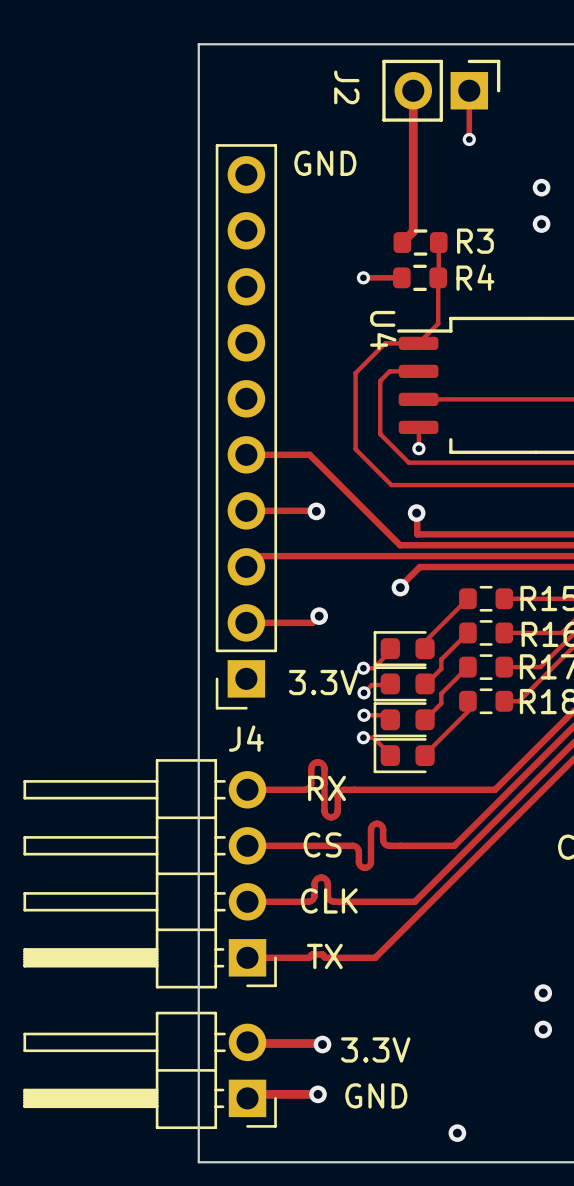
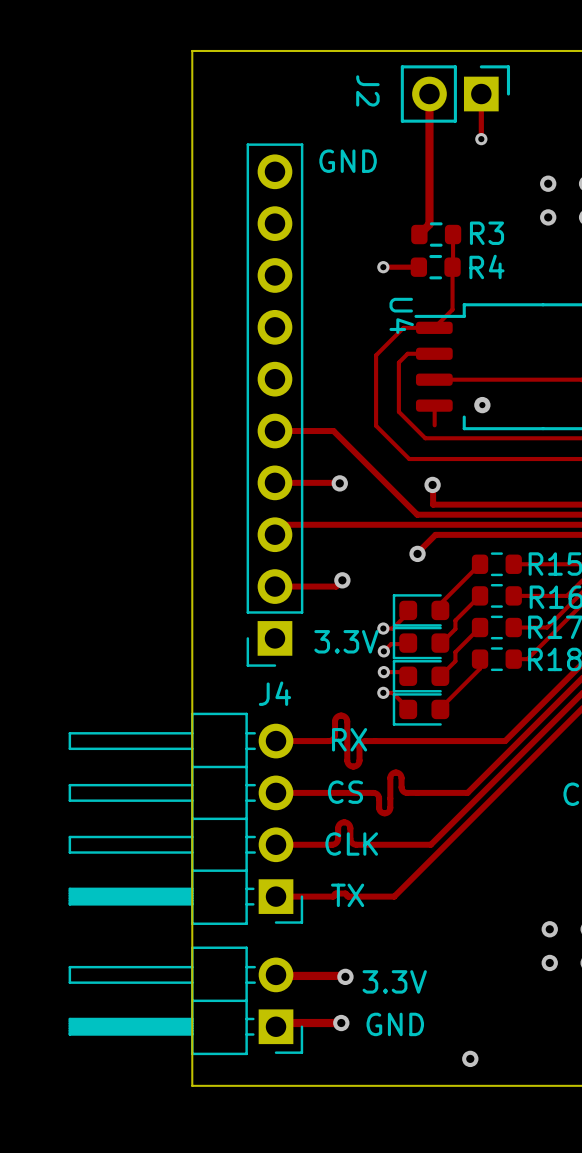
board edge: (198, 44) (198, 1162) -> (230, 50) (192, 50) (192, 1085) (230, 1085)
via: none -> (482, 405)
via: (418, 448) -> none

